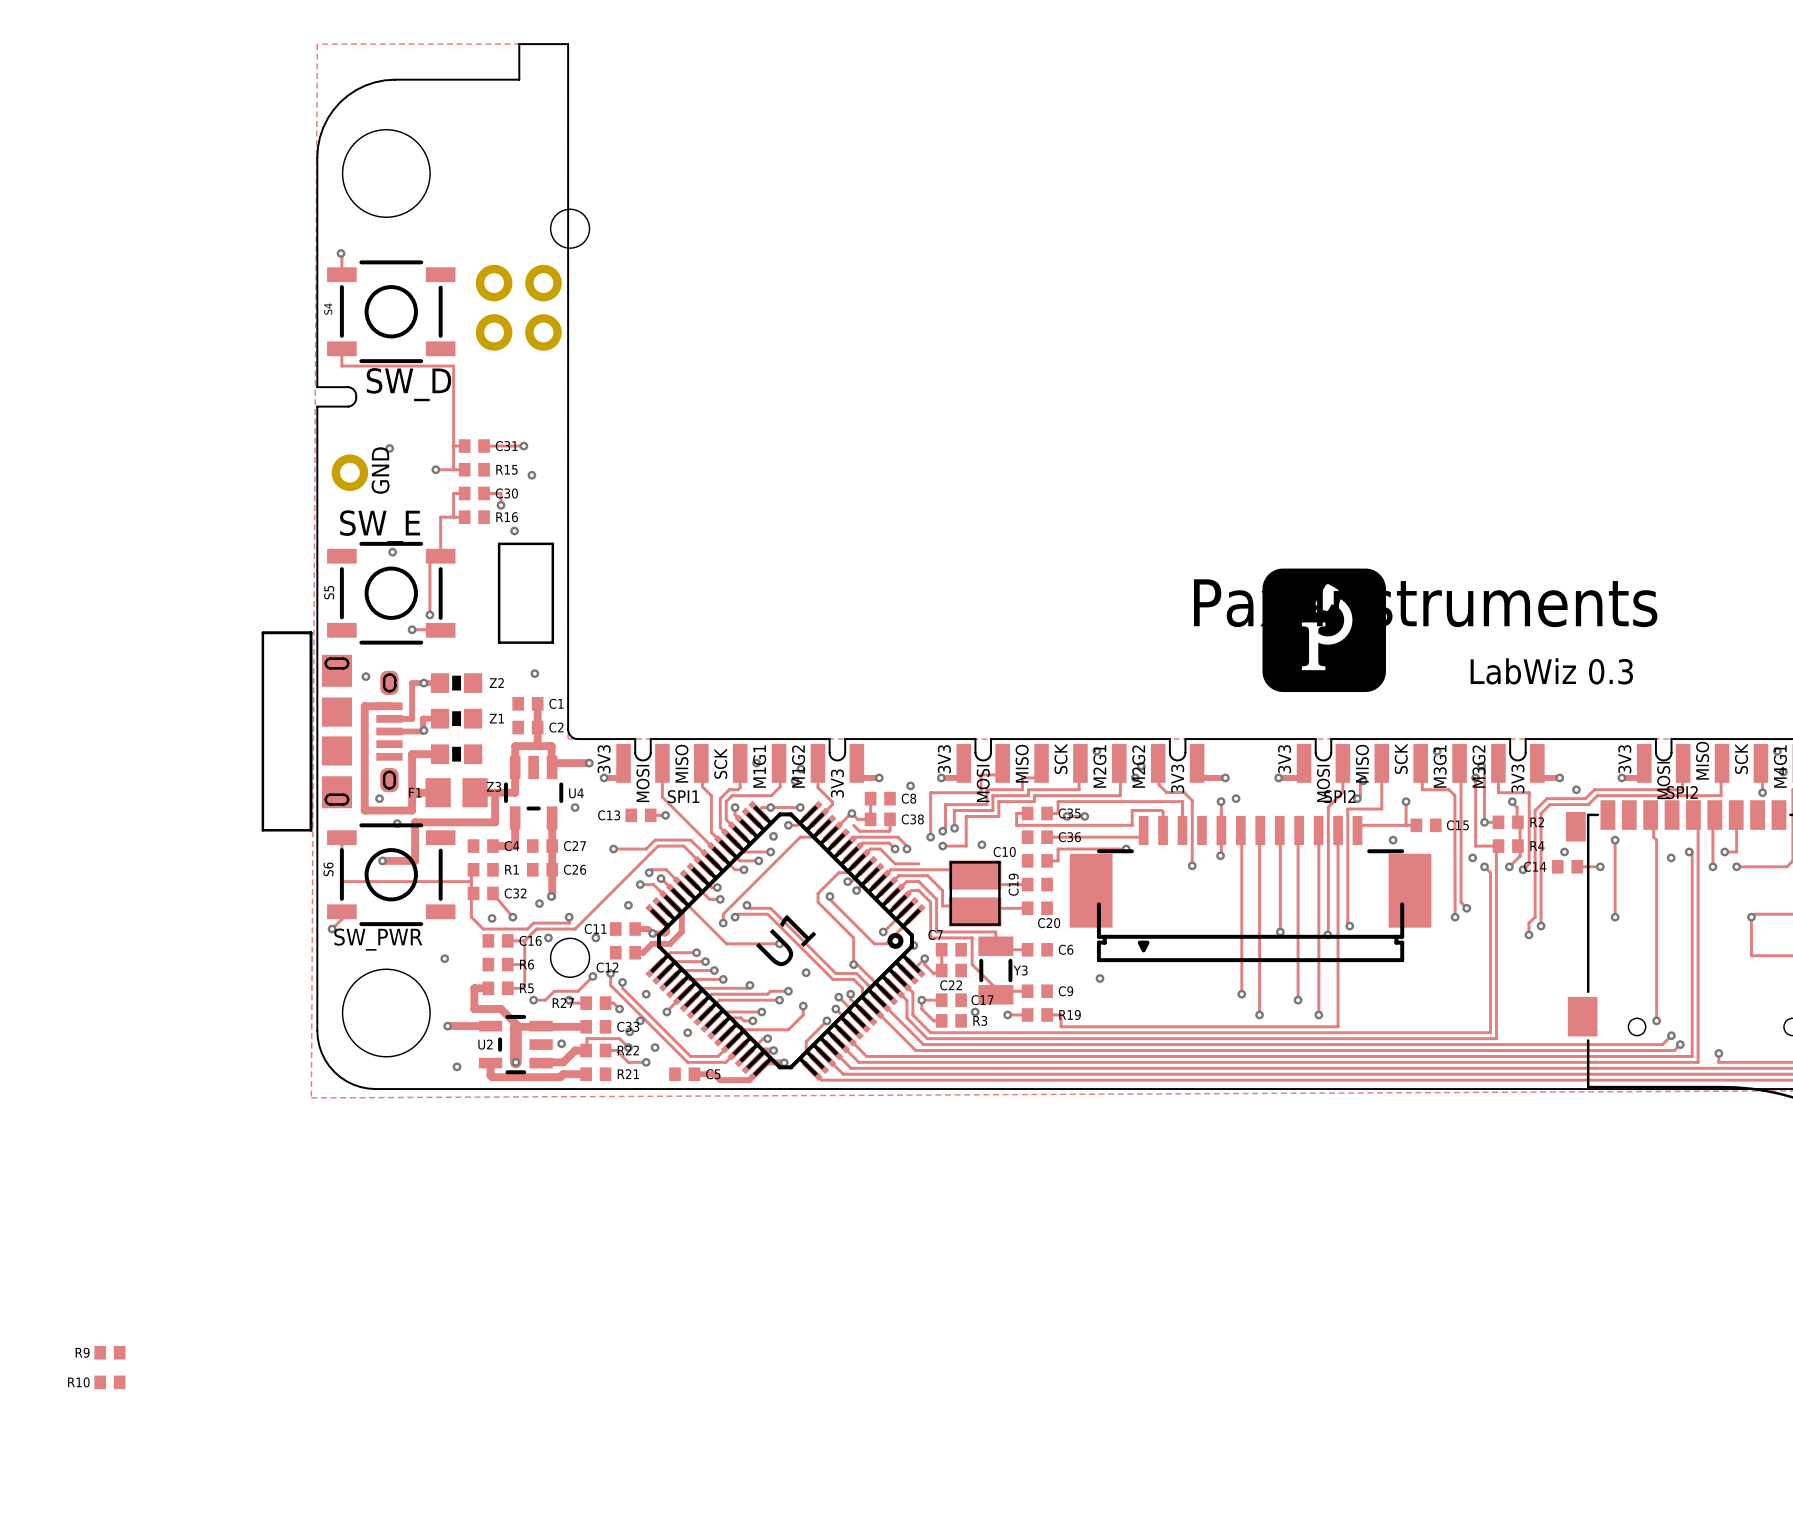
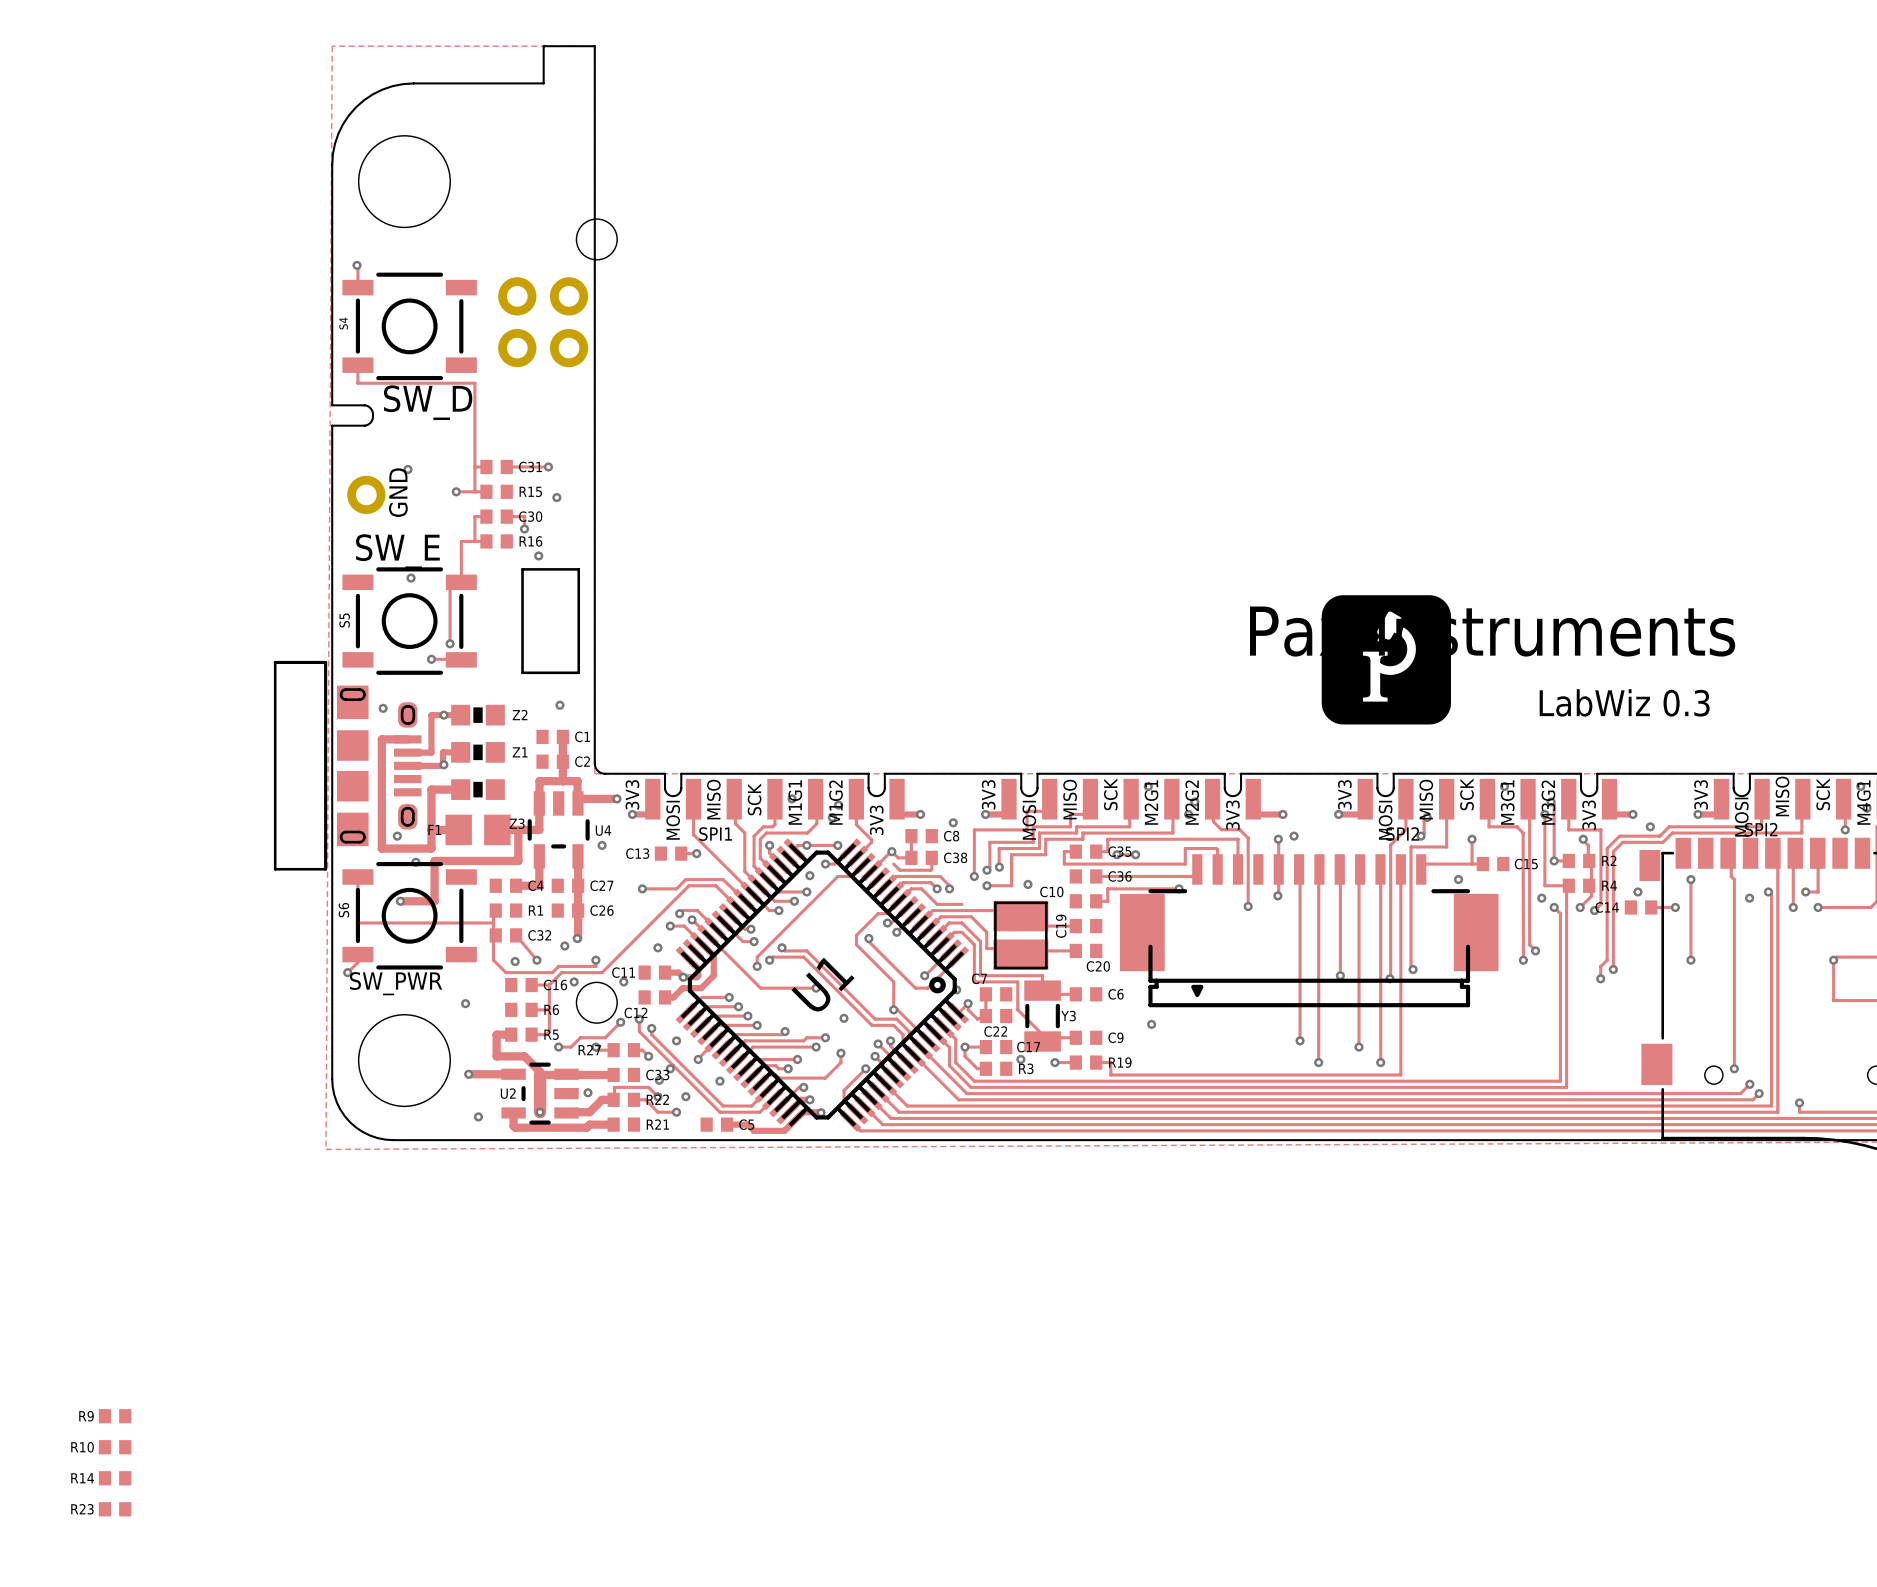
R14: none -> (115, 1478)
R23: none -> (115, 1509)

